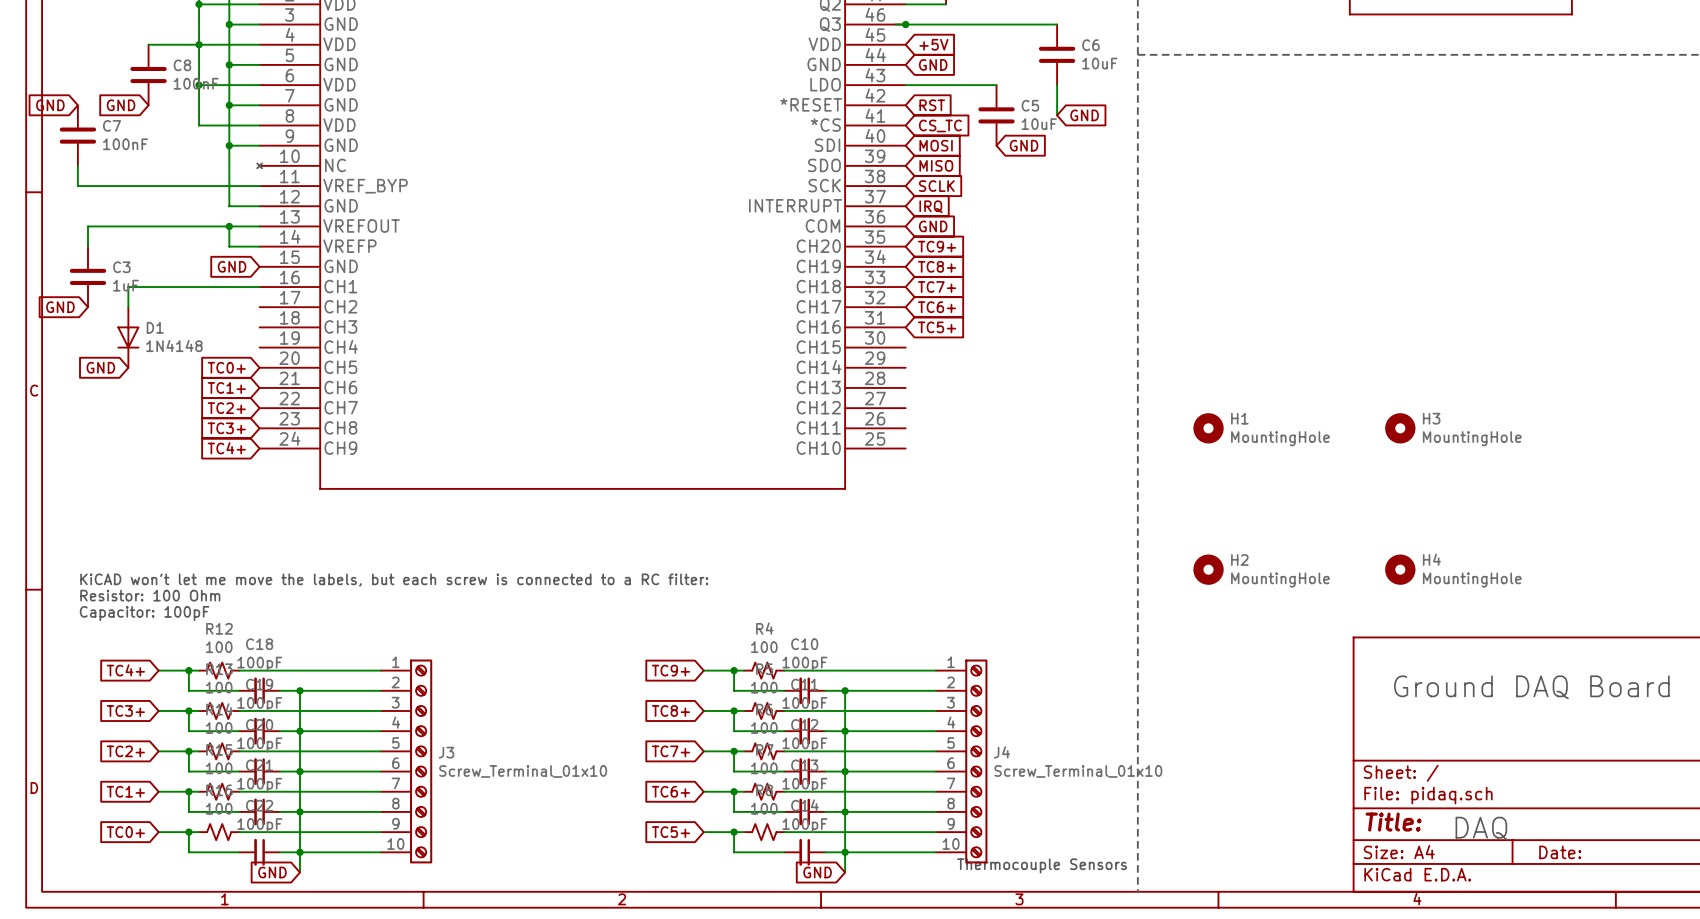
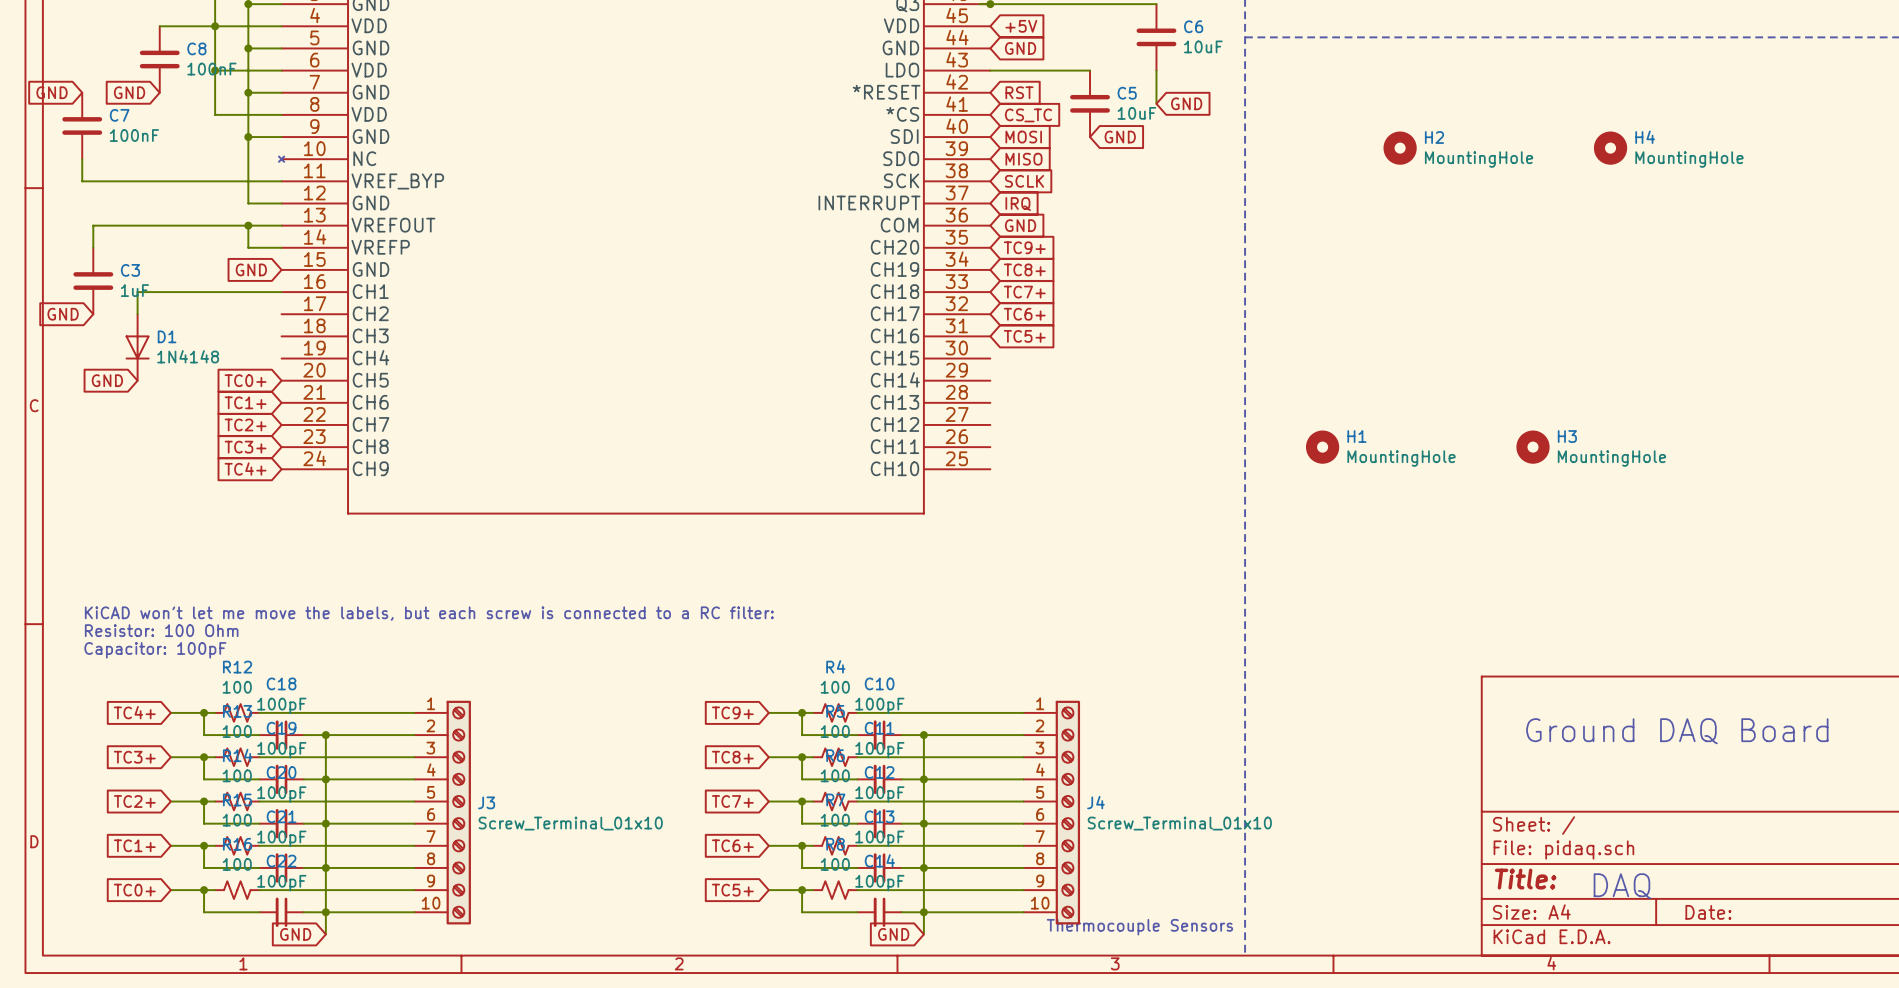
H2 position: (1208, 569) -> (1400, 148)
H4 position: (1400, 569) -> (1610, 148)

